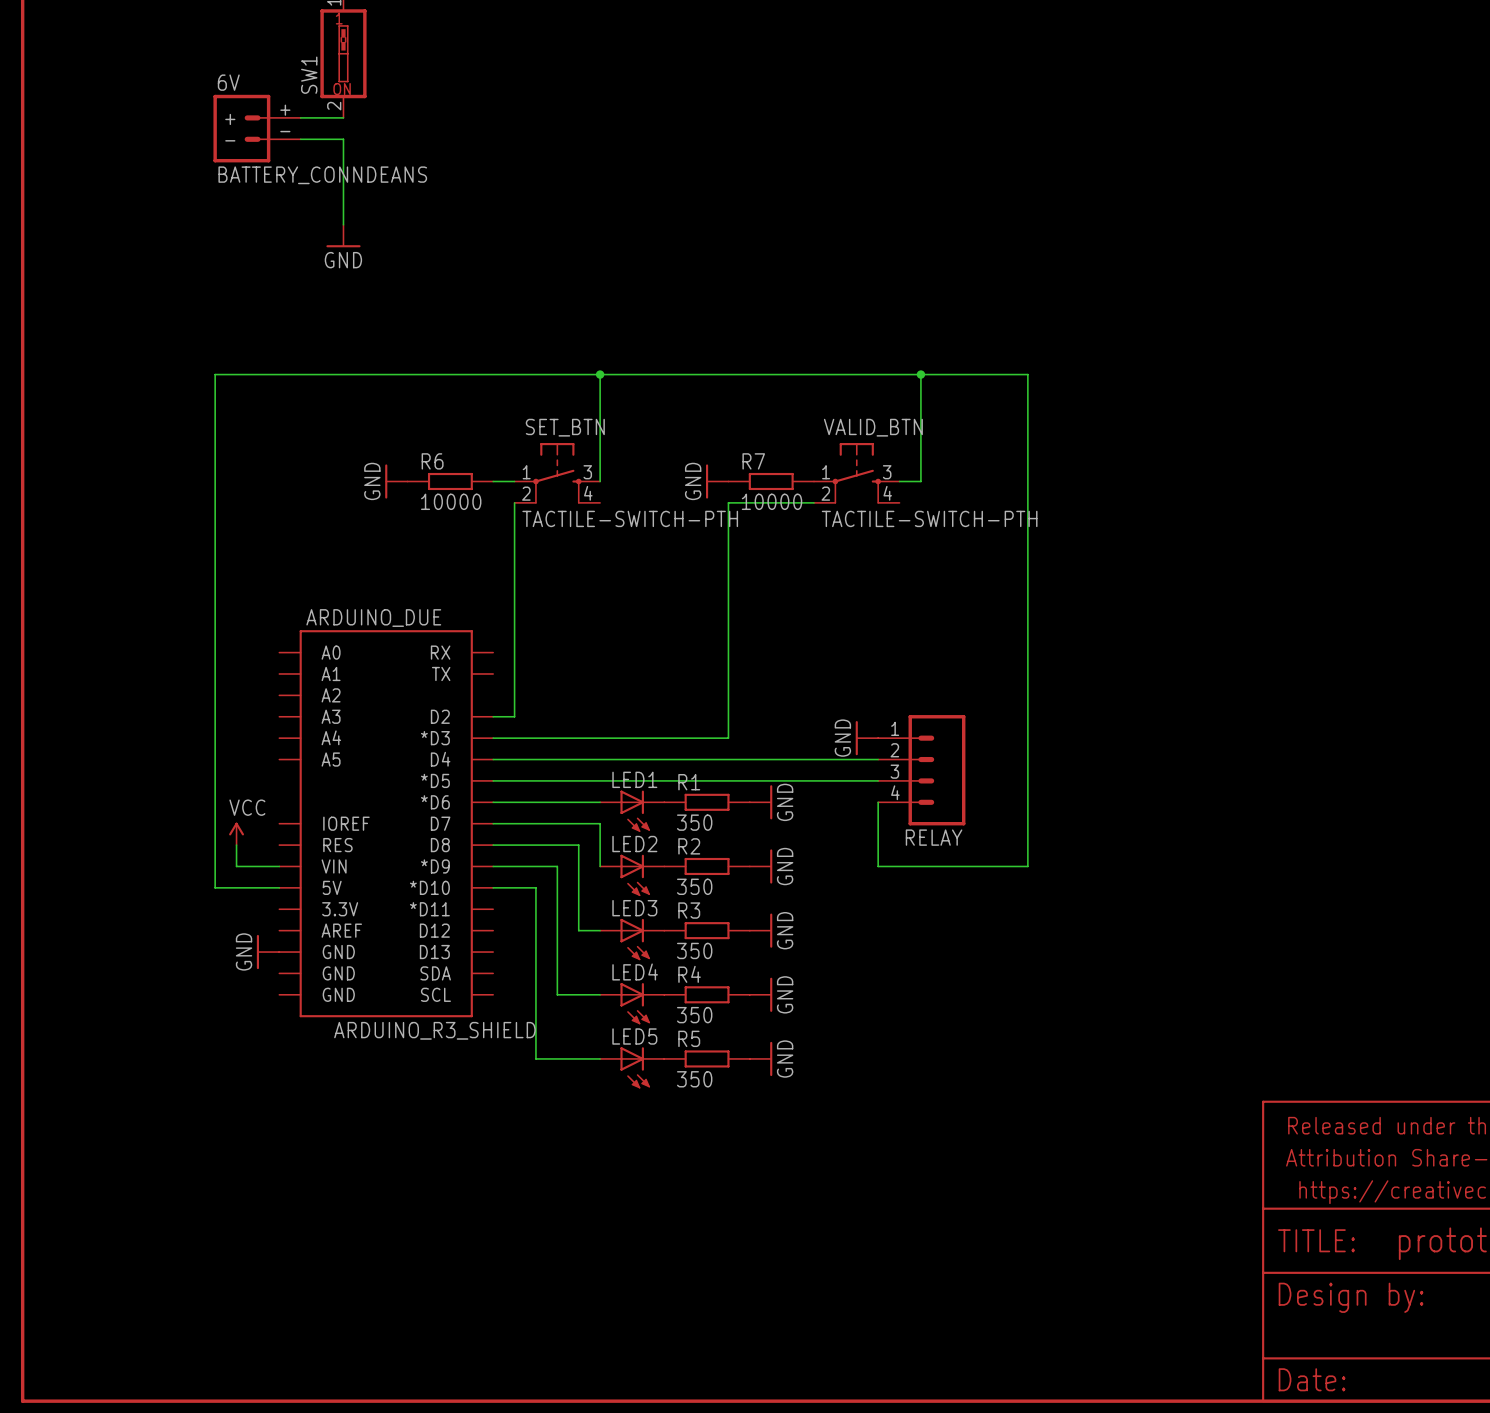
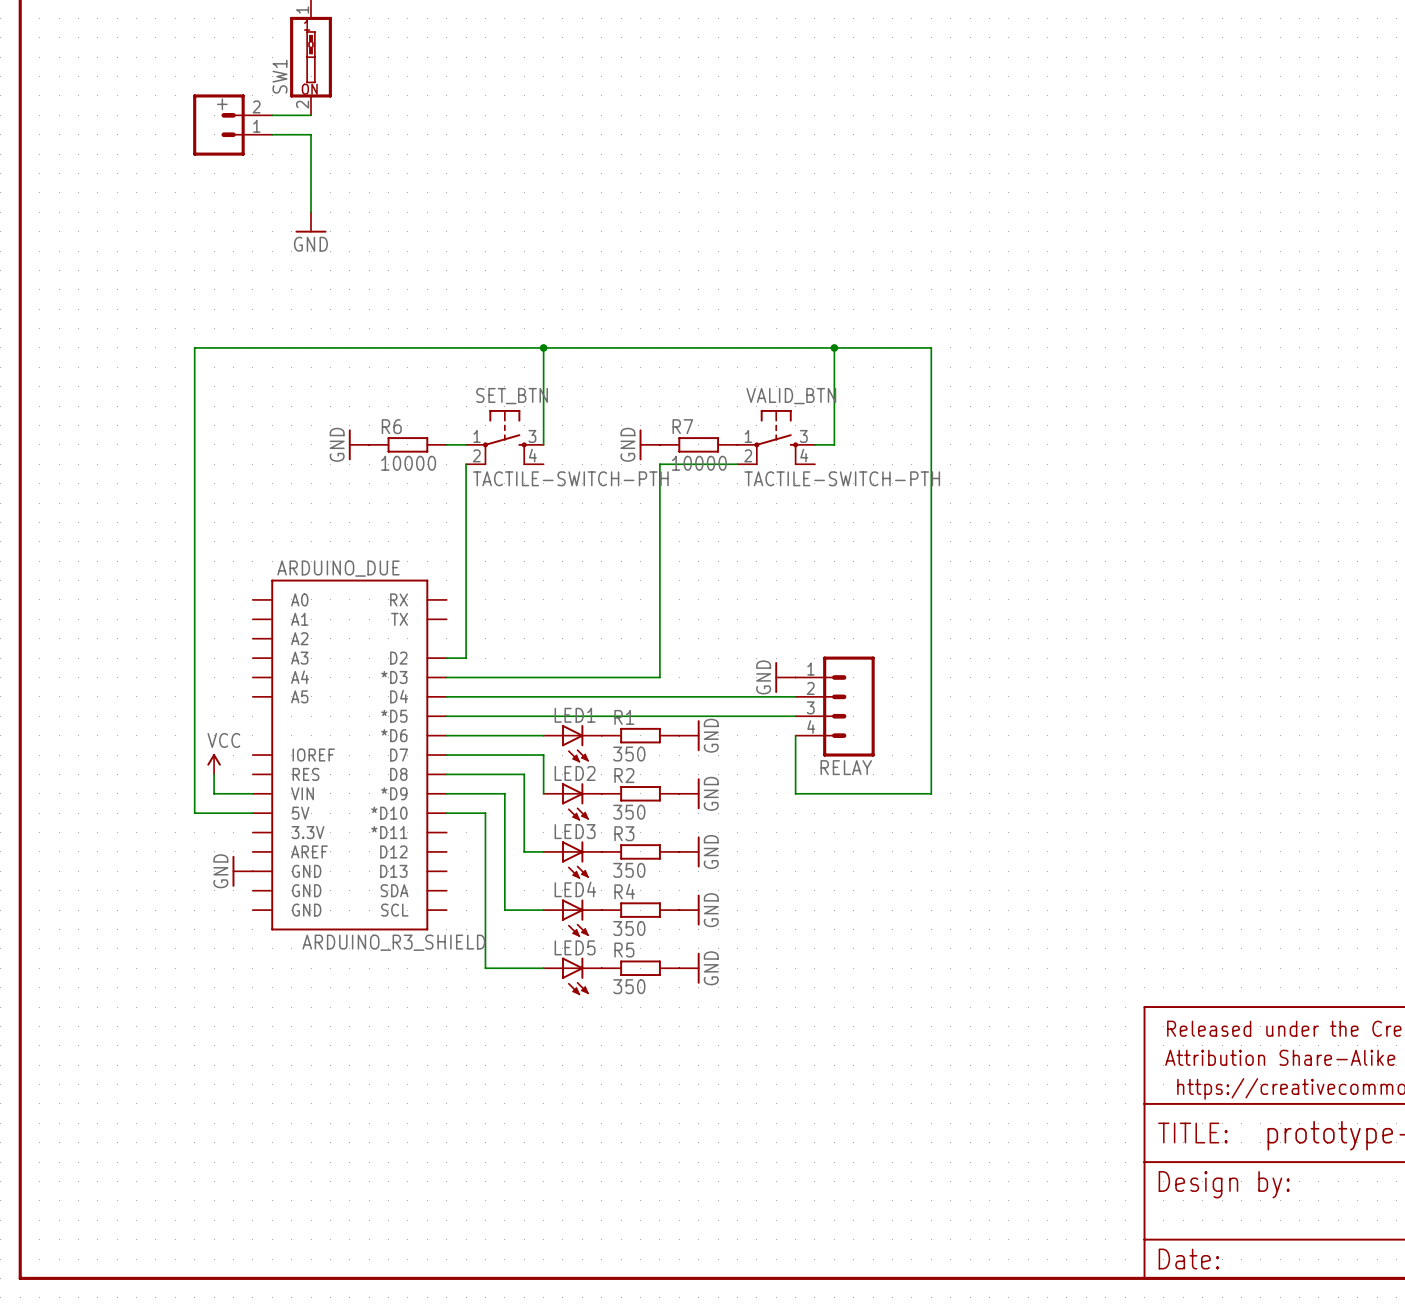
6V name: 6V (228, 82) -> + (222, 104)
6V pin number: + (285, 110) -> 2 (256, 106)
6V pin name: + (230, 119) -> none
6V pin number: - (285, 131) -> 1 (256, 126)
6V pin name: - (230, 140) -> none
6V value: BATTERY_CONNDEANS (322, 175) -> none

